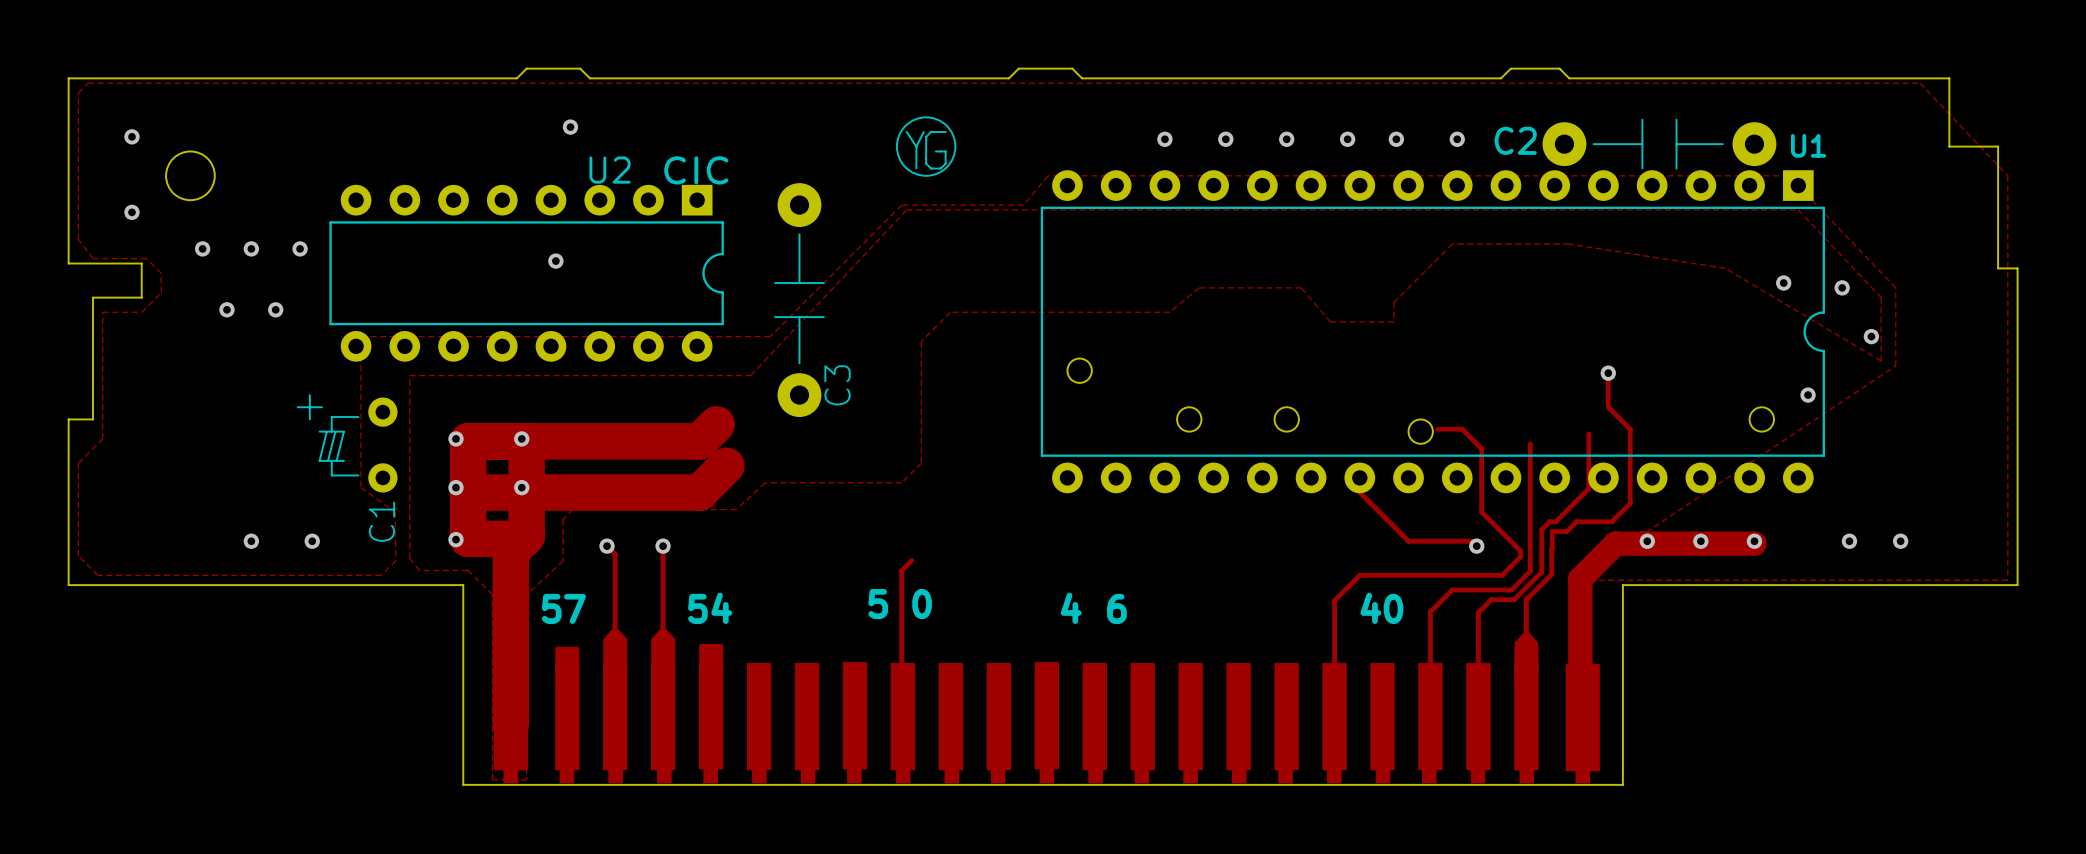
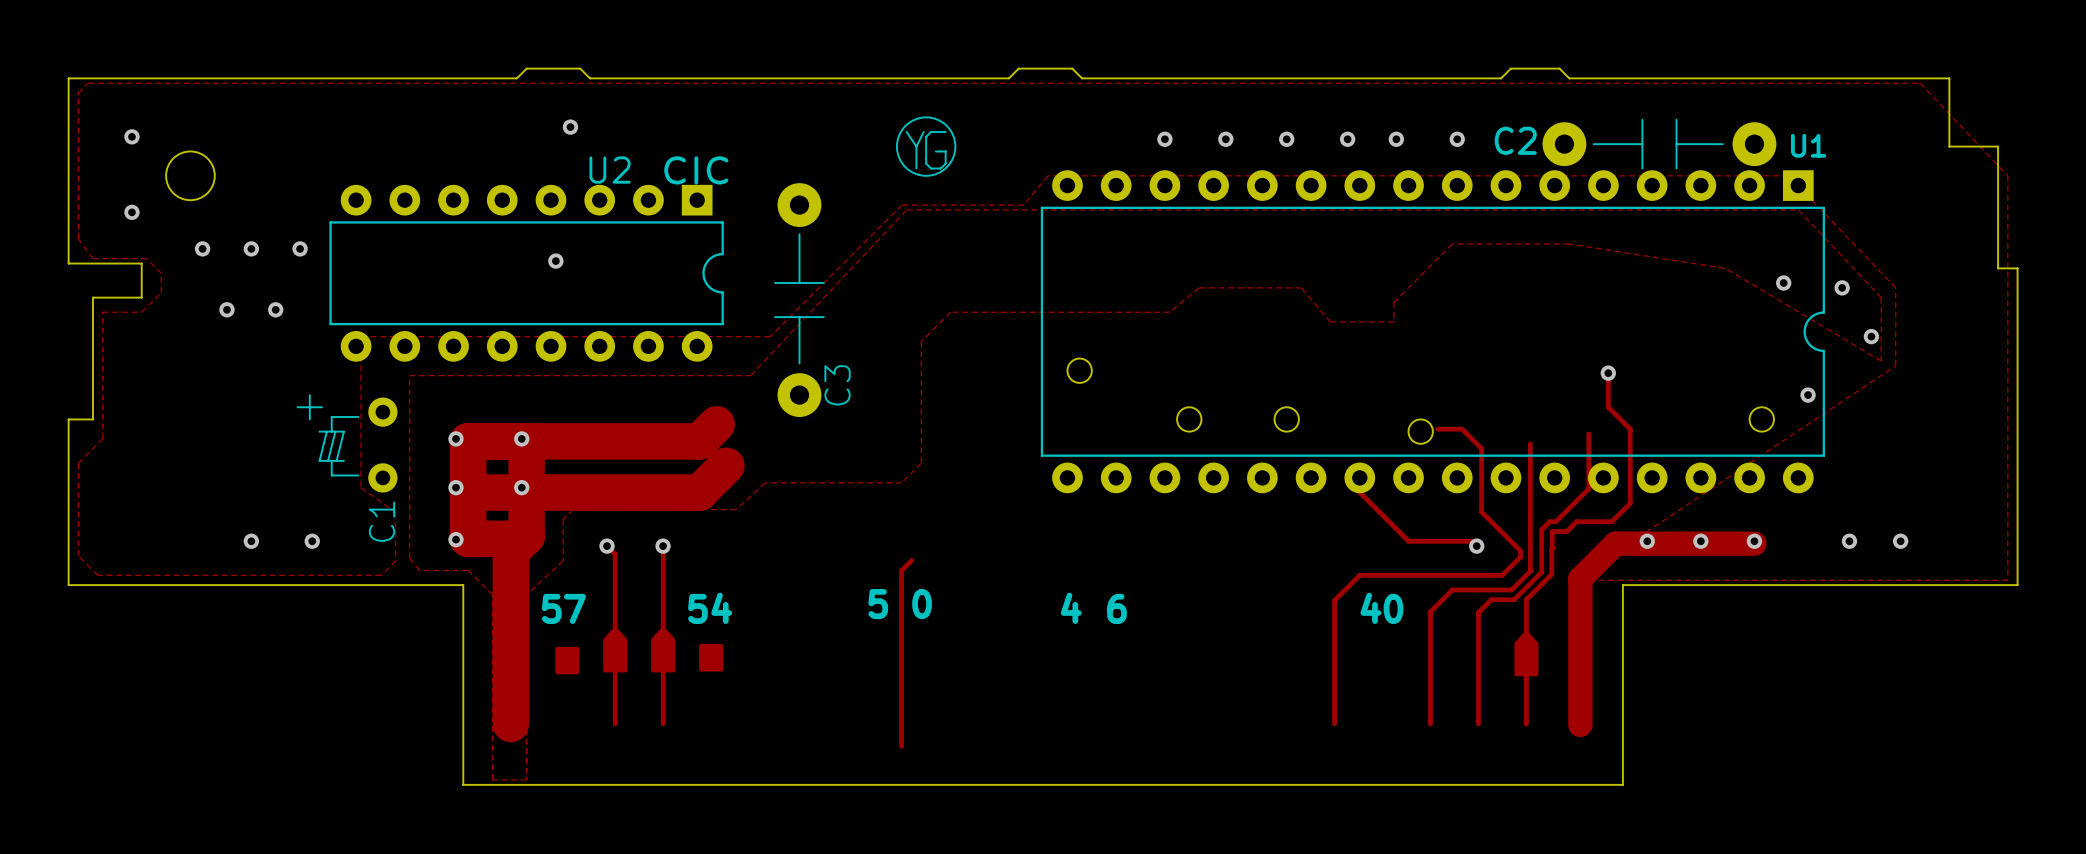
part: (1046, 722) -> none

